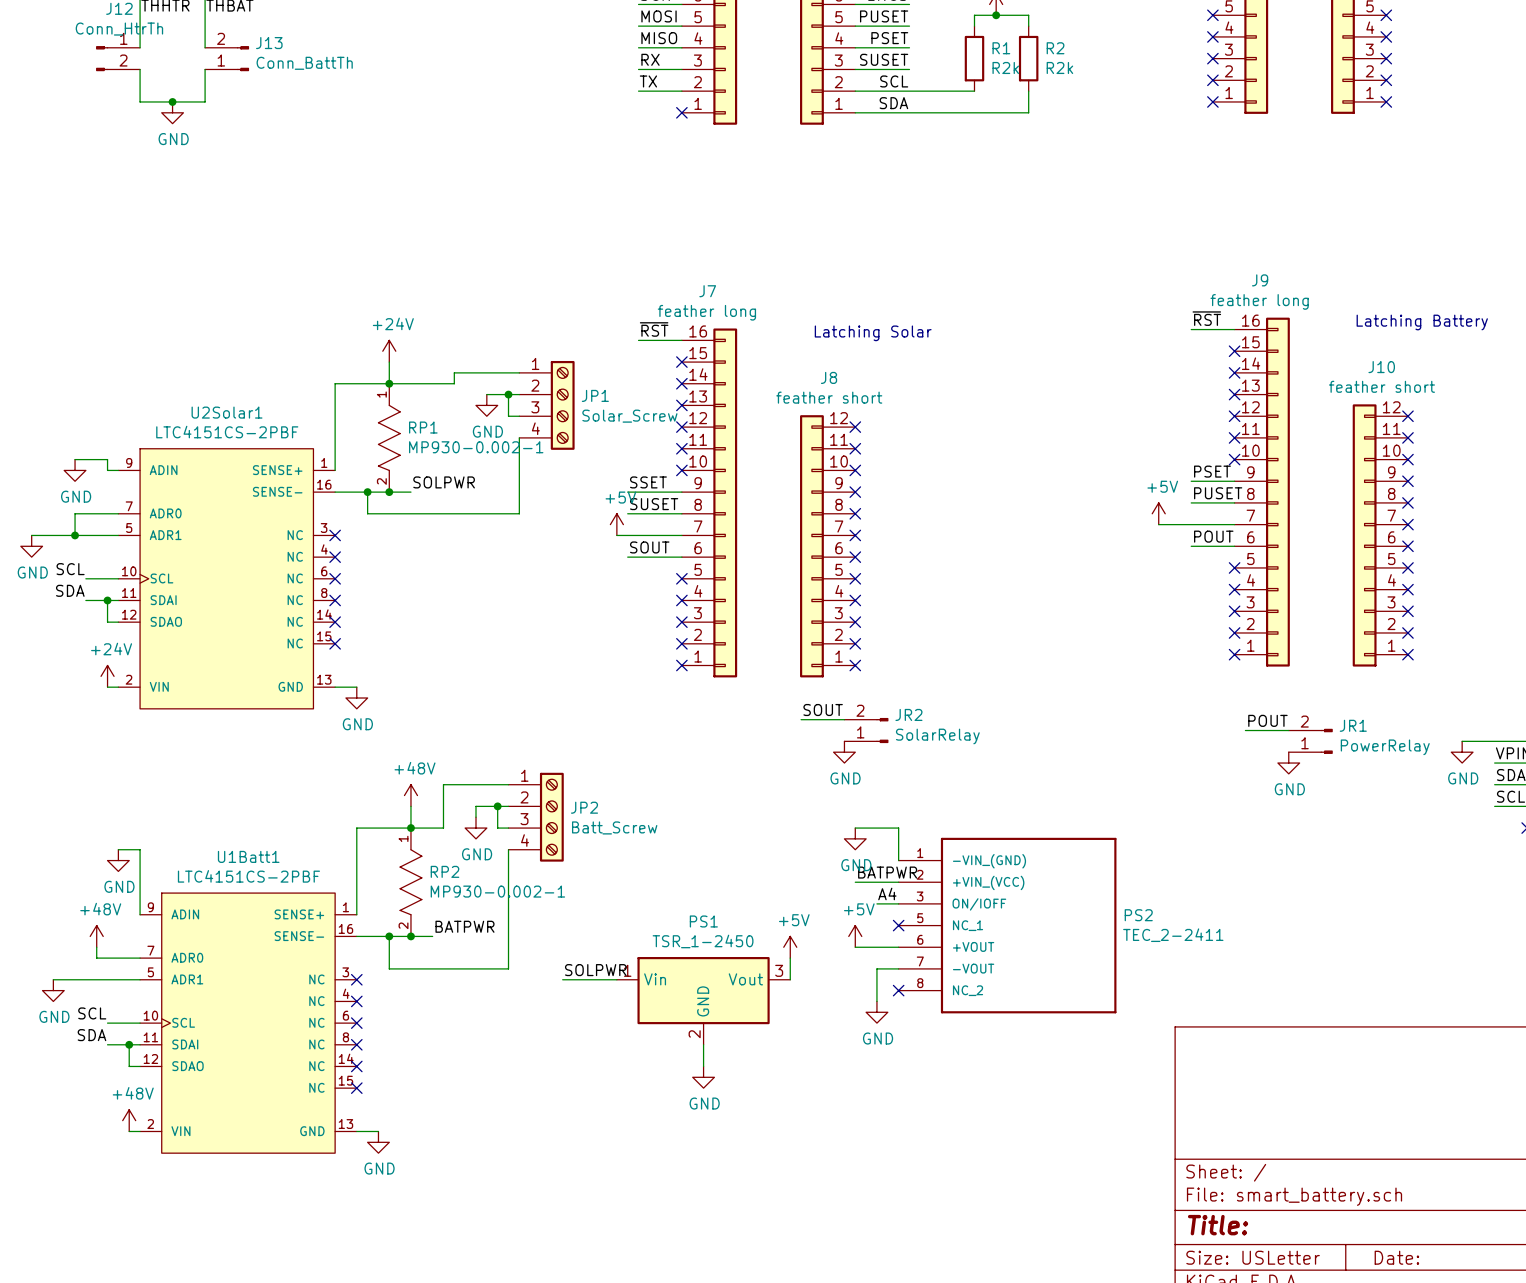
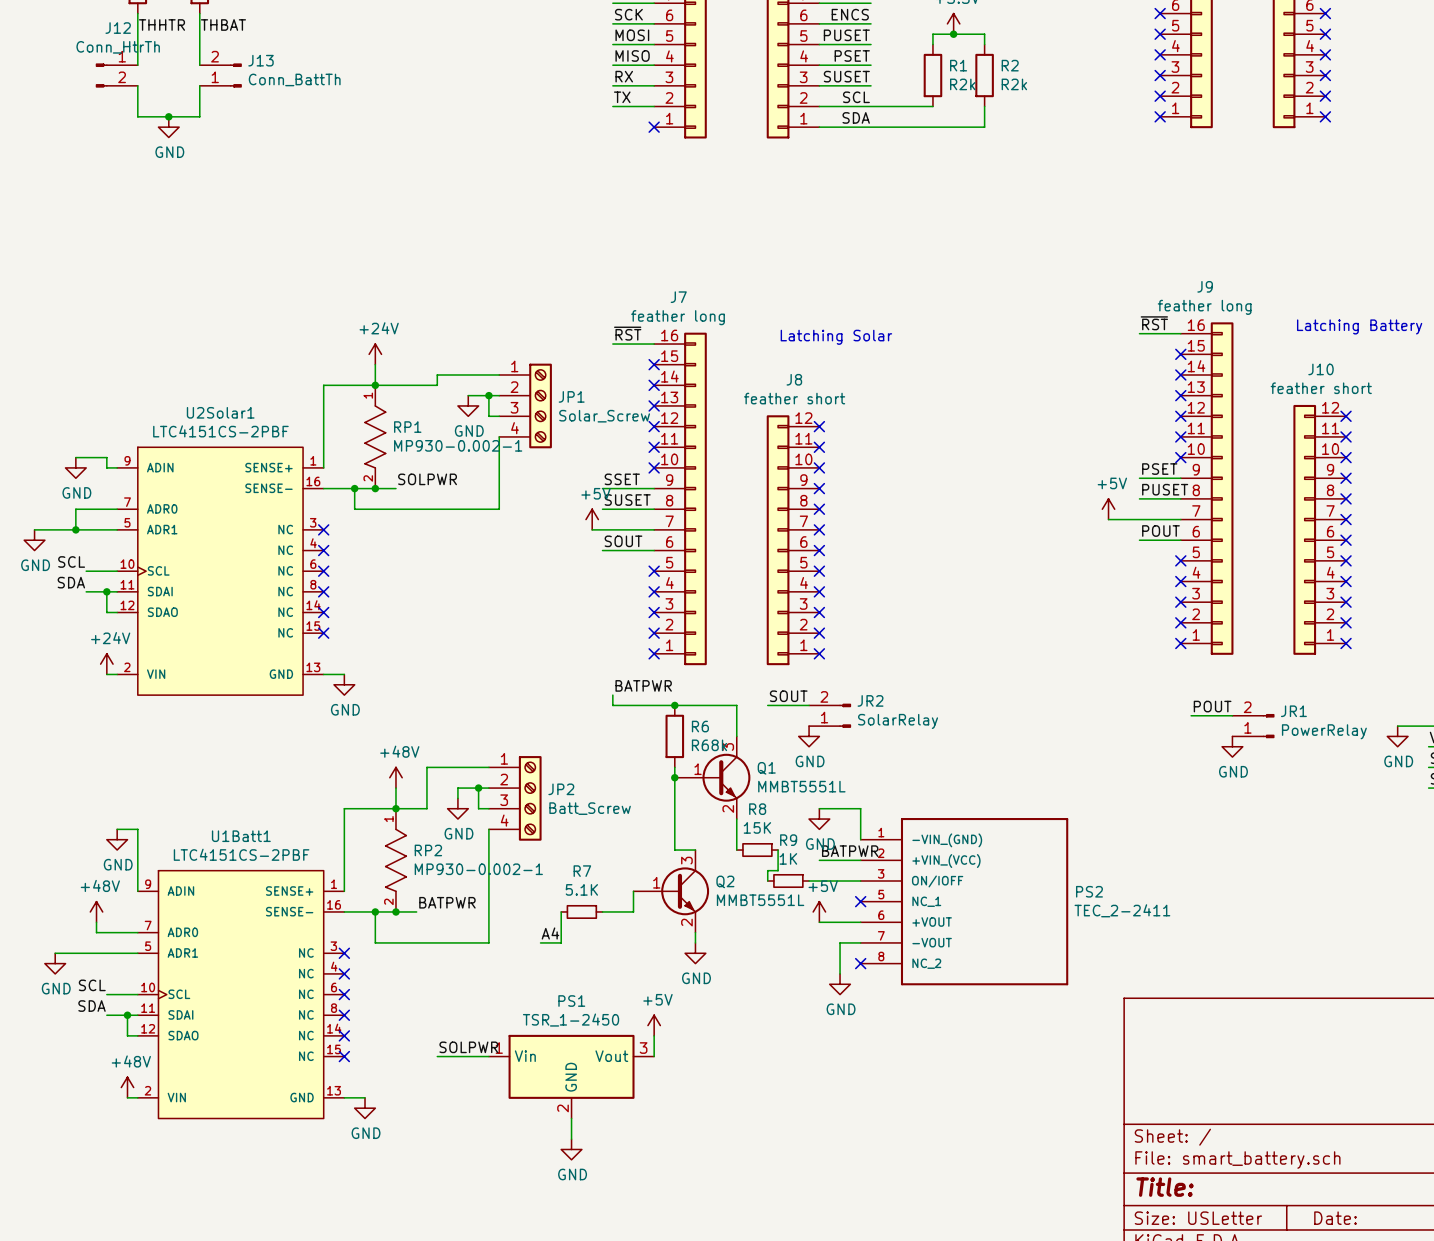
label: none -> BATPWR (643, 685)
wire: none -> (612, 695) (612, 705) (736, 705) (736, 736)
junction: none -> (674, 705)
R6: none -> R68k (674, 736)
wire: none -> (674, 767) (674, 850) (695, 850)
junction: none -> (674, 777)
Q1: none -> MMBT5551L (712, 777)
wire: none -> (736, 819) (736, 850)
R8: none -> 15K (757, 850)
wire: none -> (778, 850) (778, 870) (767, 870) (767, 881)
label: A4 (887, 893) -> none
R9: none -> 1K (788, 881)
wire: none -> (809, 881) (840, 881)
wire: none -> (633, 891) (633, 911) (602, 911)
Q2: none -> MMBT5551L (671, 891)
wire: none -> (561, 911) (561, 942) (540, 942)
R7: none -> 5.1K (581, 911)
power symbol position: +5V (790, 947) -> +5V (654, 1025)
wire: (790, 958) (790, 979) -> (654, 1035) (654, 1056)
label: none -> A4 (550, 933)
label position: SOLPWR (595, 970) -> SOLPWR (468, 1047)
wire: (562, 979) (616, 979) -> (437, 1056) (488, 1056)
power symbol: none -> GND (695, 953)
PS1 position: (703, 1000) -> (571, 1076)
wire: (703, 1044) (703, 1066) -> (571, 1118) (571, 1139)
power symbol: GND (703, 1077) -> none
power symbol: none -> GND (571, 1149)

